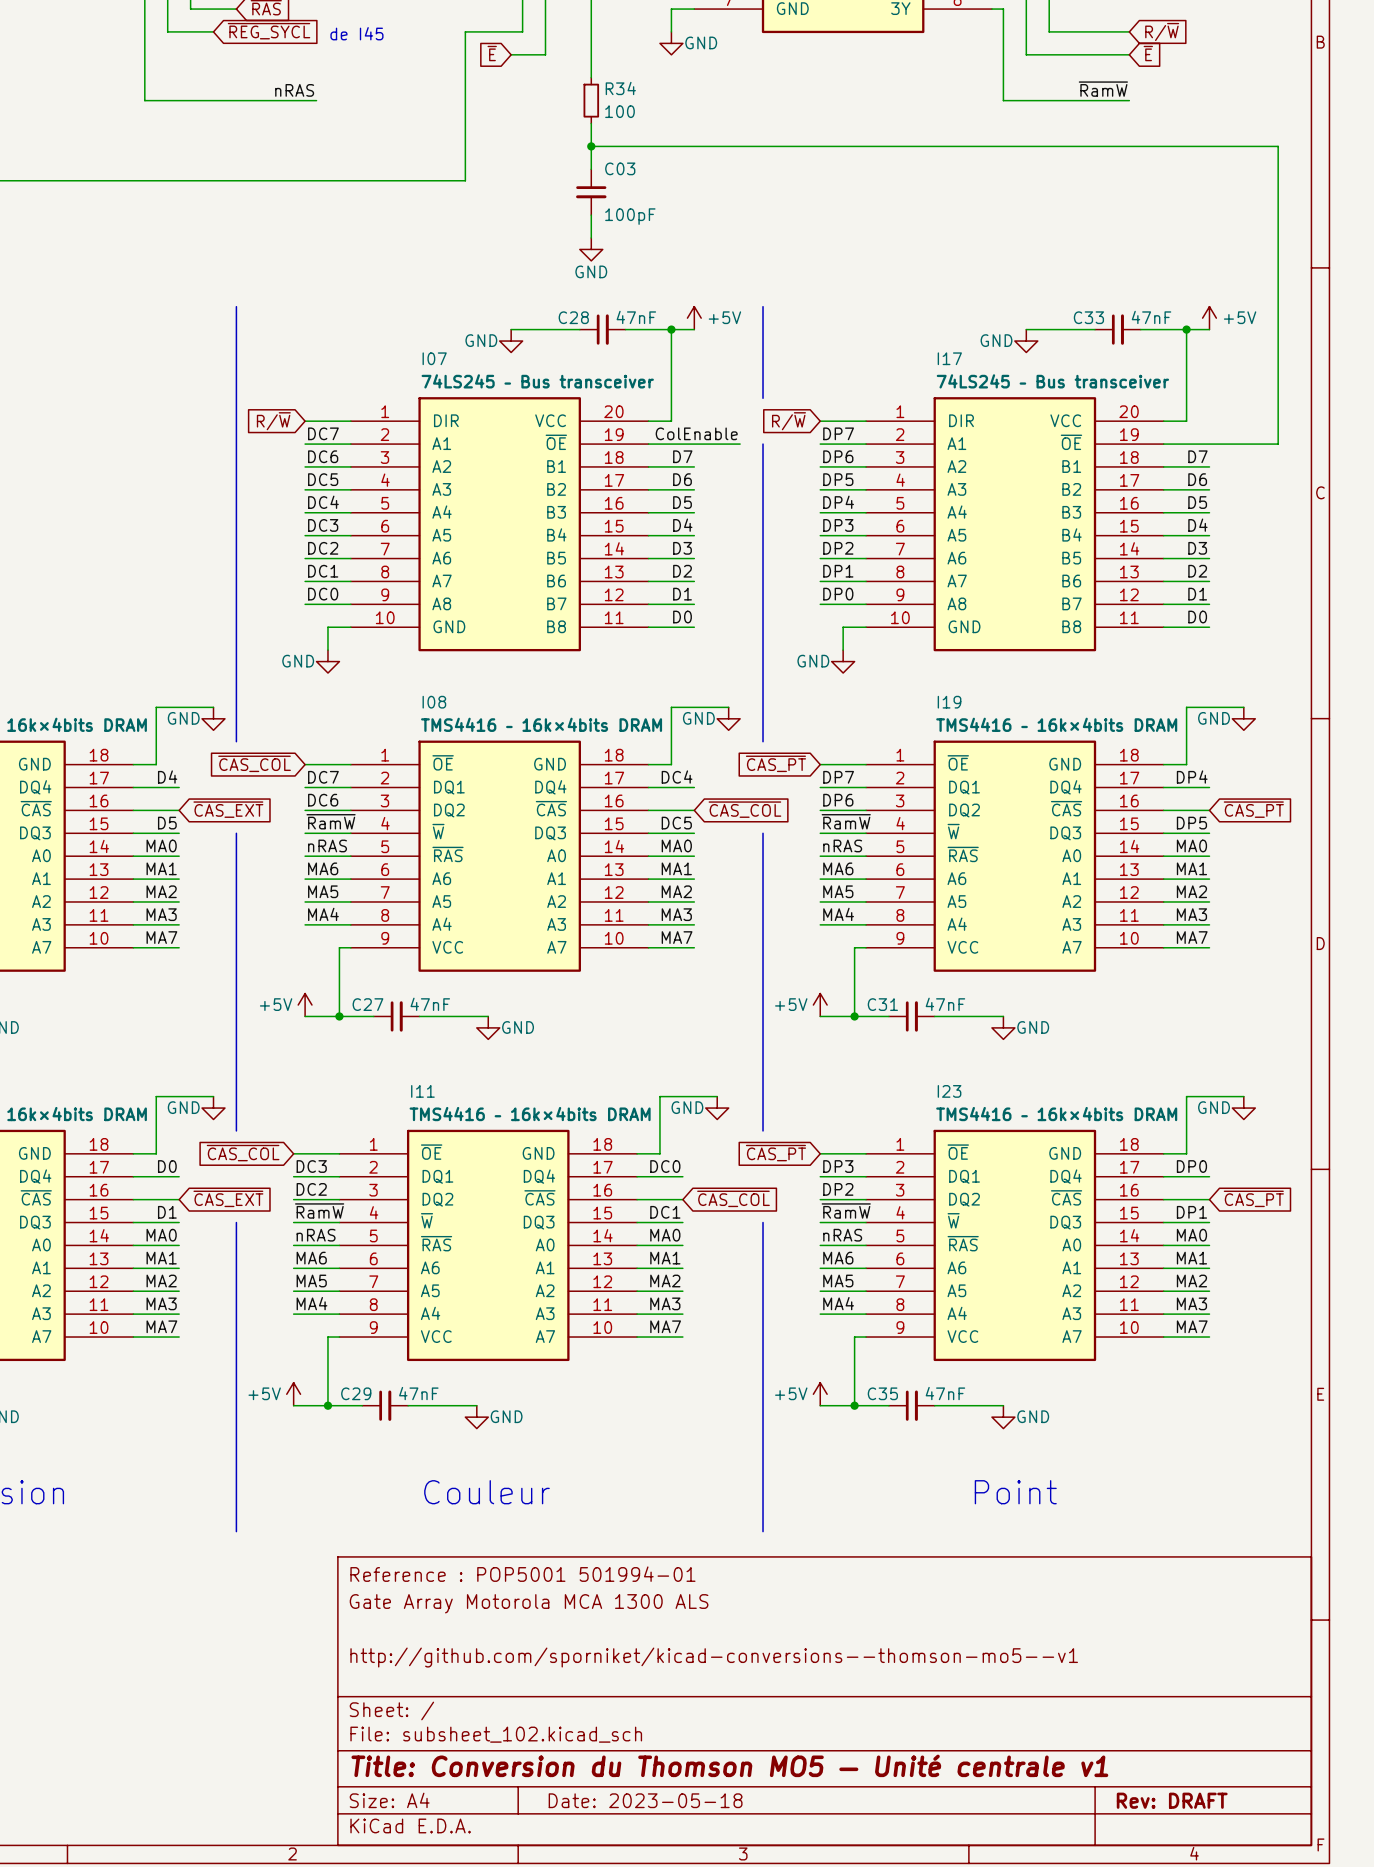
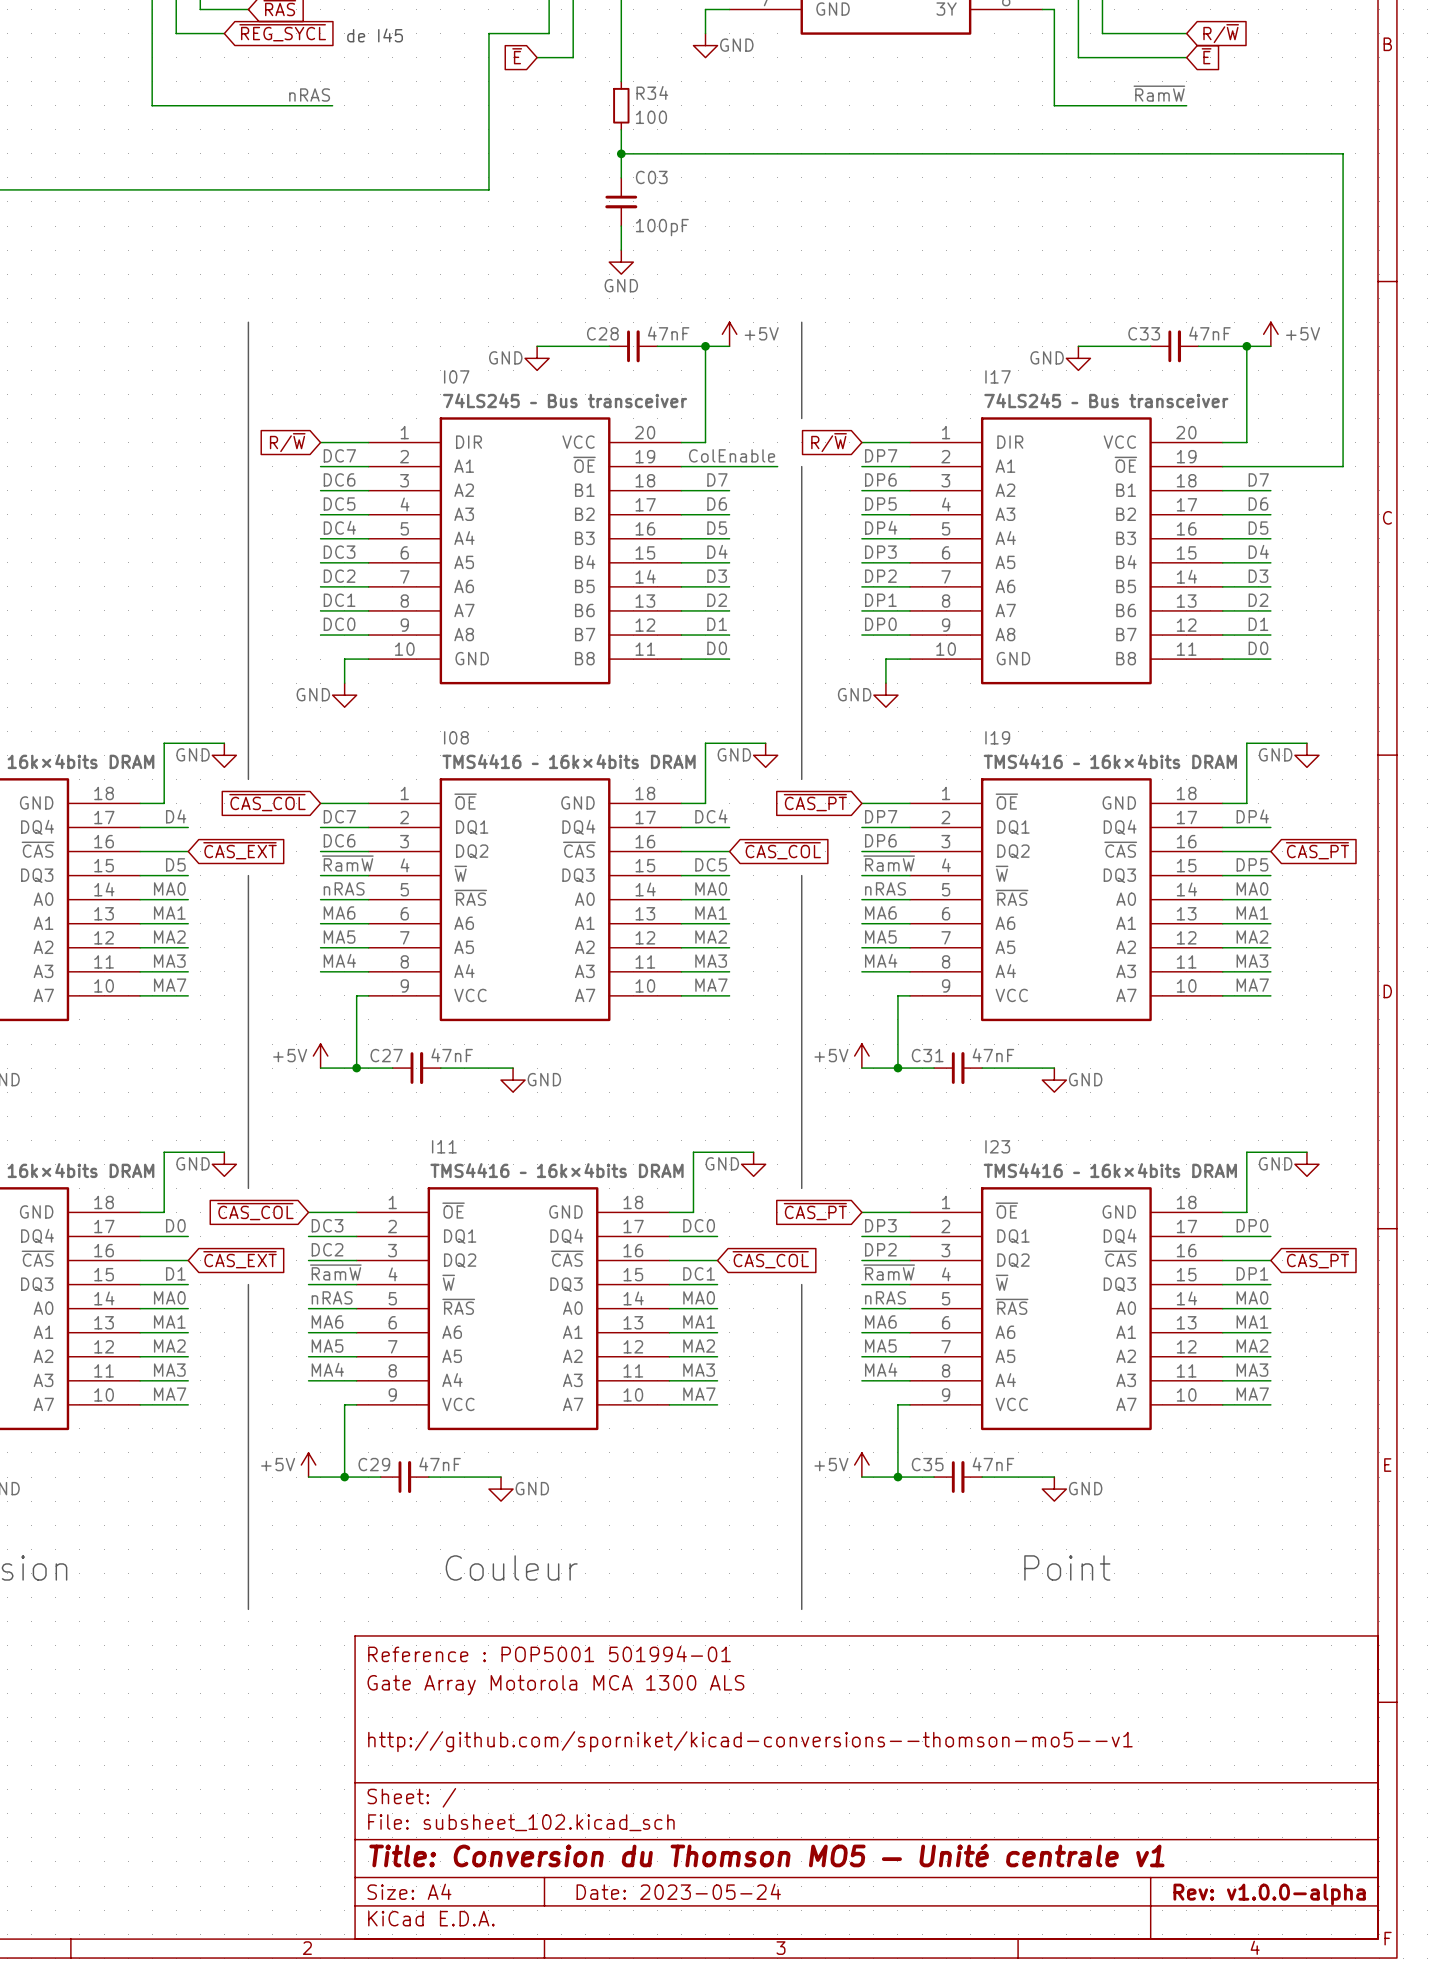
title block: Date: 2023-05-18 (645, 1800) -> Date: 2023-05-24 (678, 1891)
title block: Rev: DRAFT (1172, 1800) -> Rev: v1.0.0-alpha (1269, 1894)

